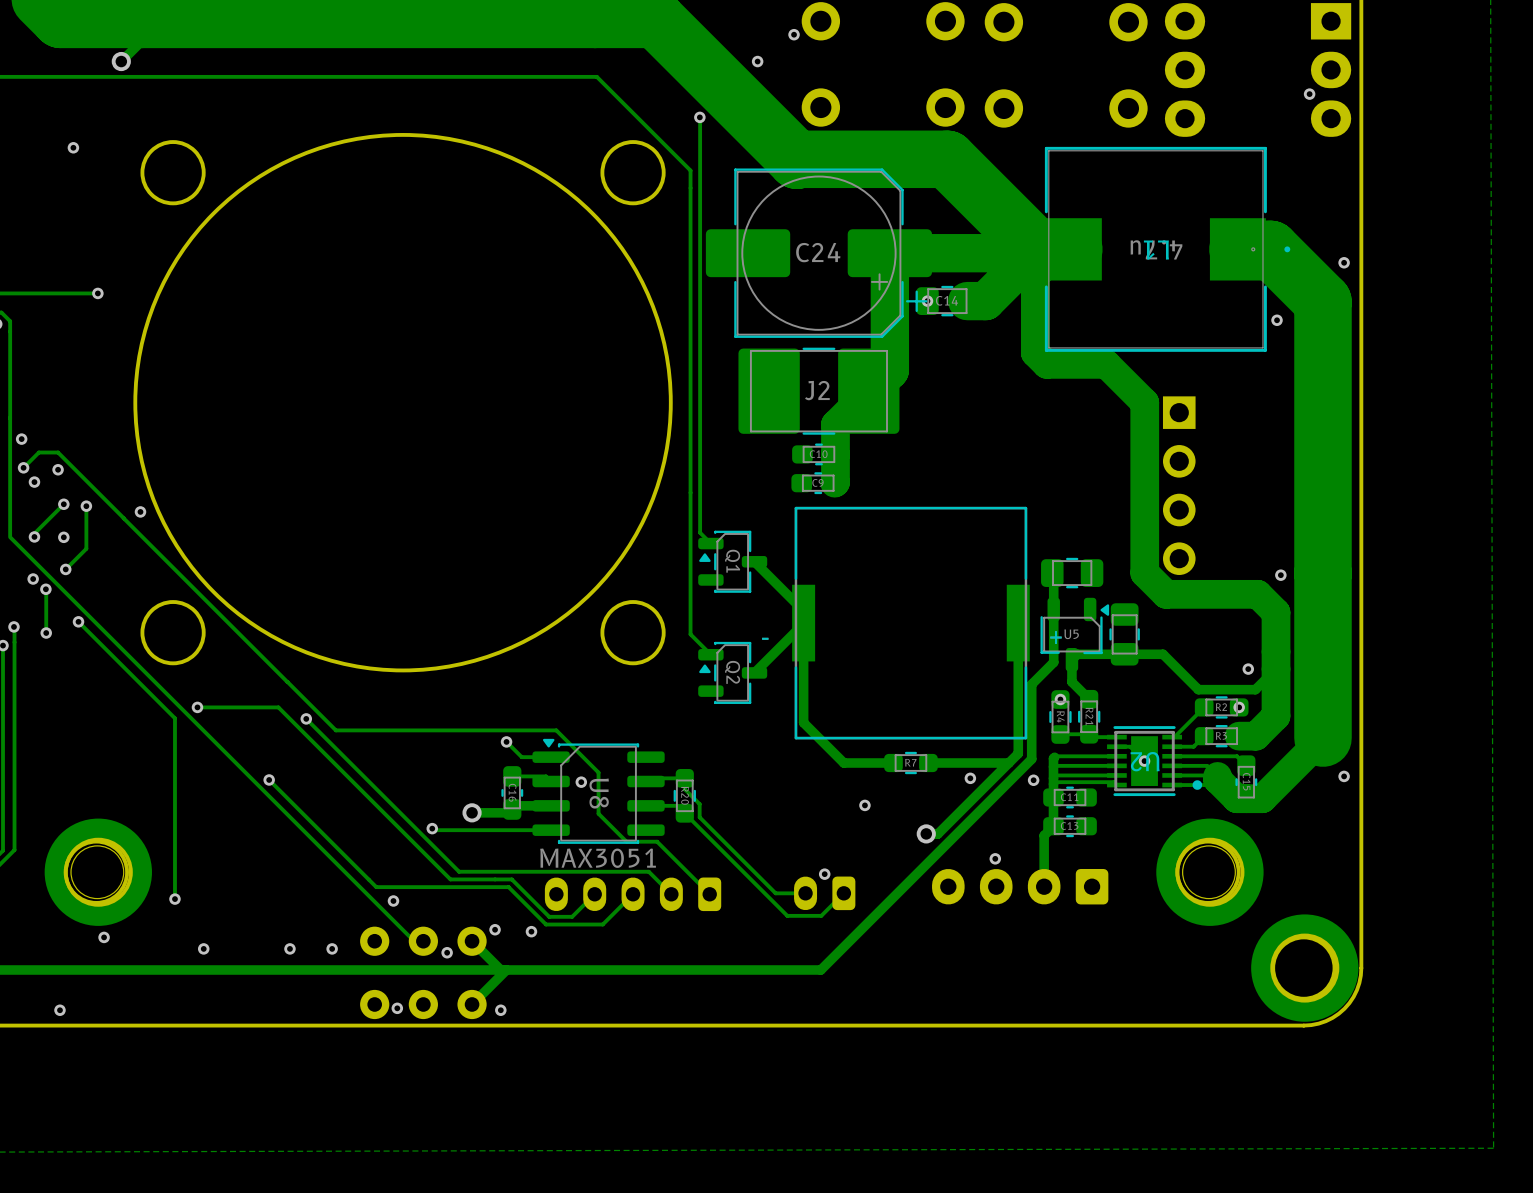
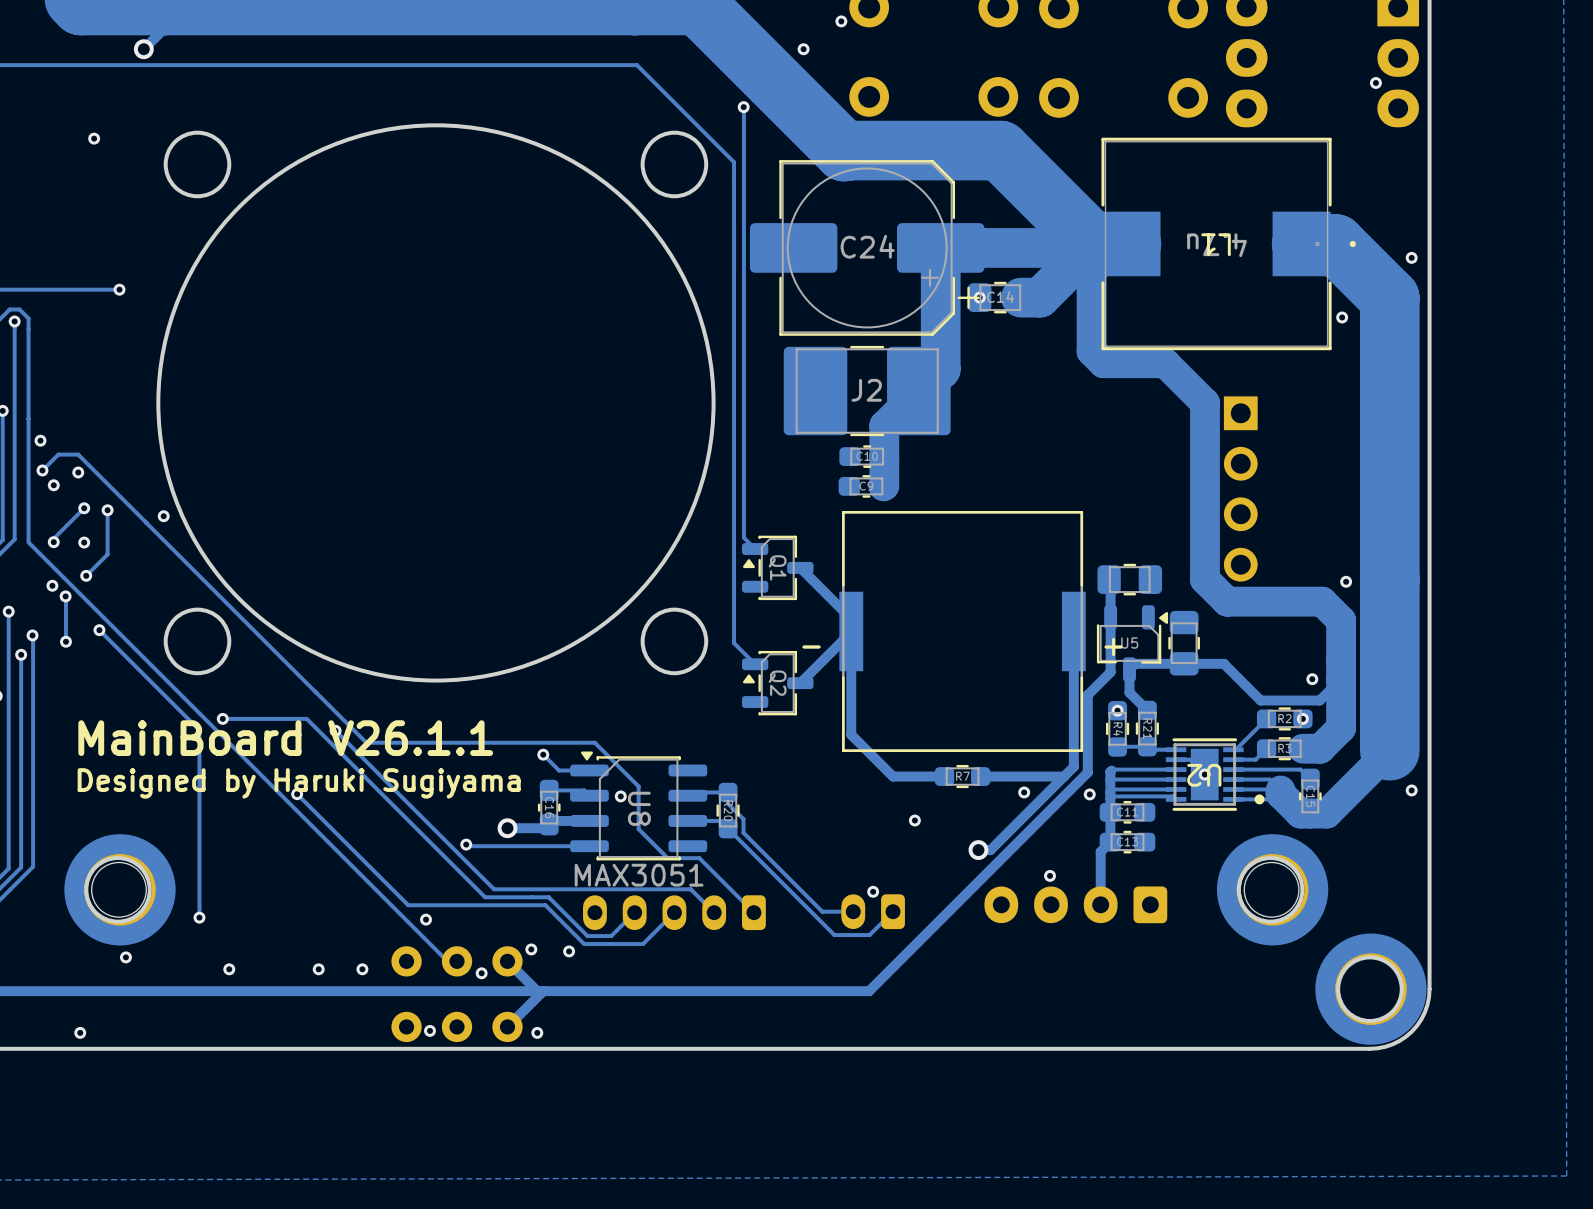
text: none -> MainBoard V26.1.1 (285, 738)
text: none -> Designed by Haruki Sugiyama (299, 783)

